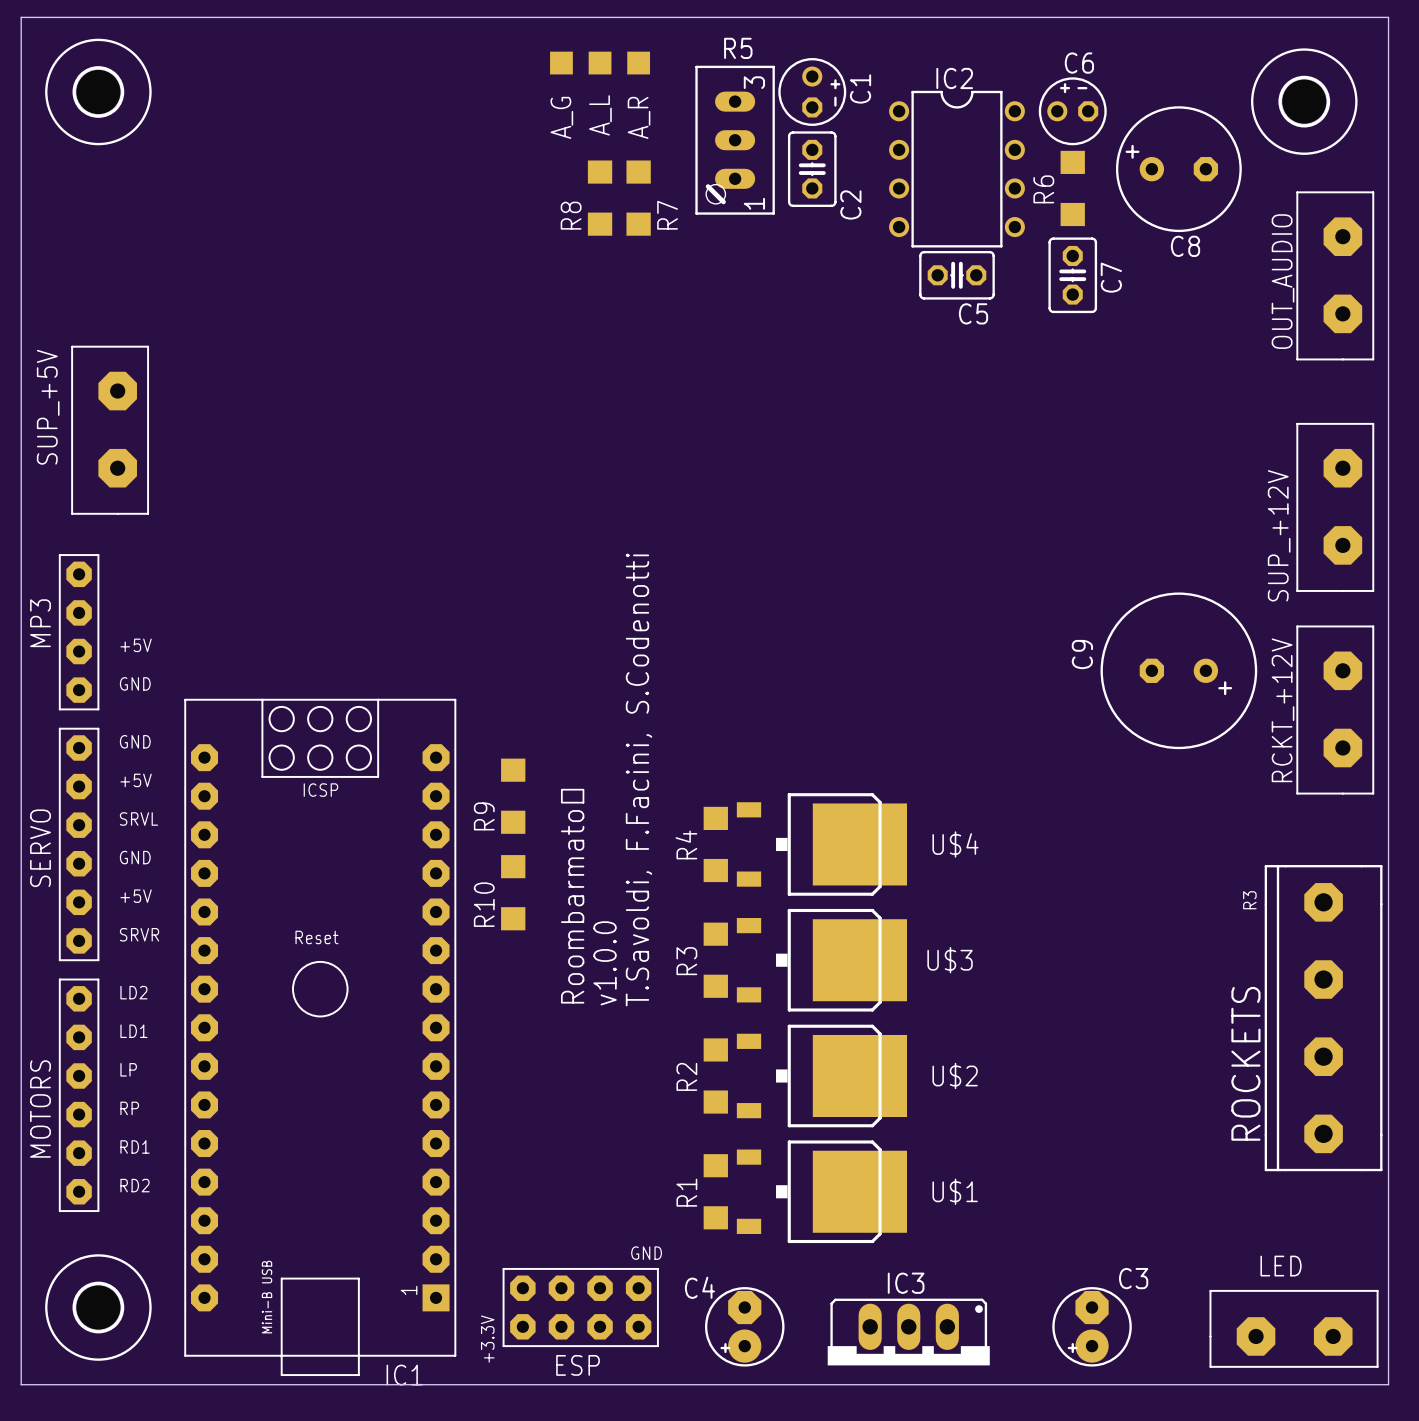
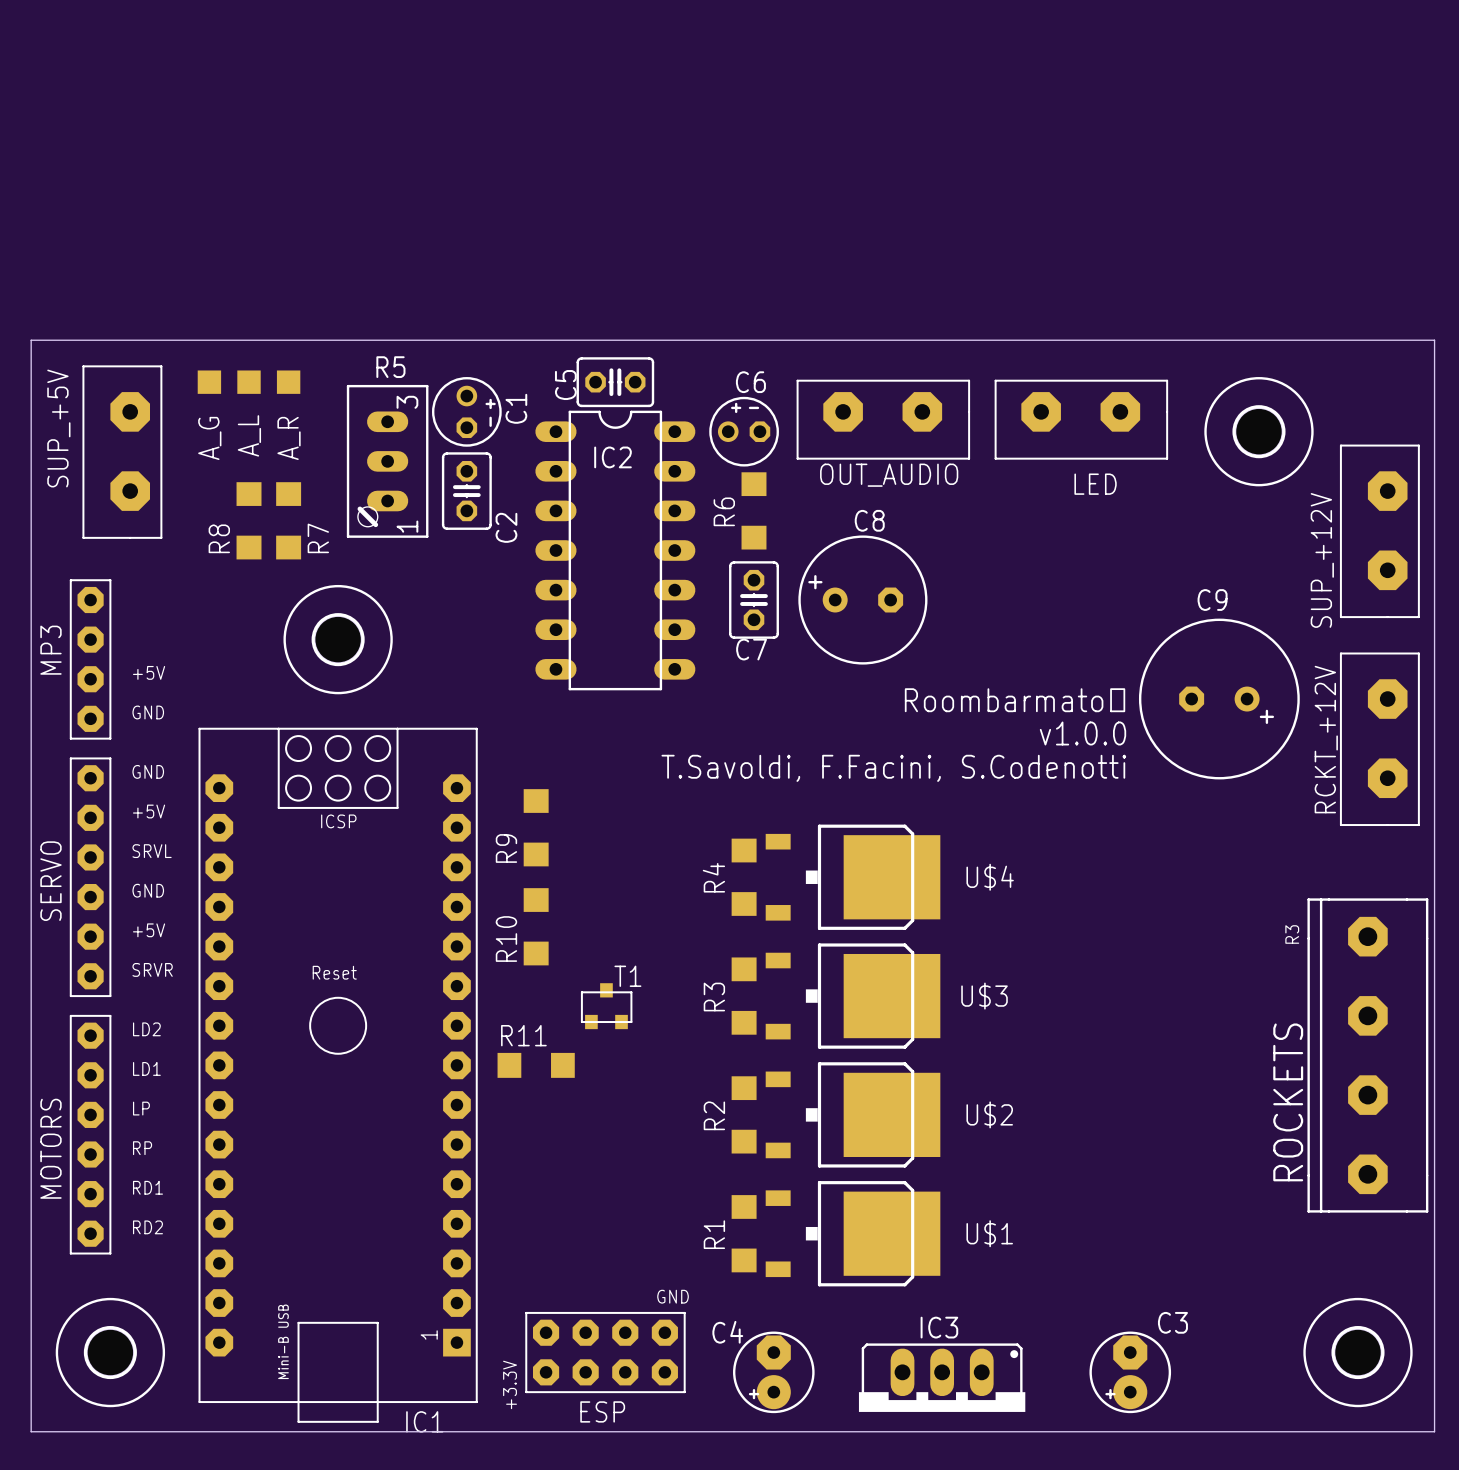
A_G: (561, 63) -> none
A_L: (600, 63) -> none
A_R: (638, 63) -> none
IC2 footprint: [889, 90, 1025, 248] -> [535, 410, 696, 691]
part: (98, 91) -> none
C1 position: (812, 91) -> (466, 411)
part position: (1304, 101) -> (1258, 431)
C6 position: (1072, 111) -> (744, 431)
R5 position: (735, 140) -> (387, 461)
C2 position: (812, 169) -> (466, 491)
C8 position: (1178, 169) -> (862, 600)
R6 position: (1072, 188) -> (754, 510)
R8 position: (600, 198) -> (249, 520)
R7 position: (638, 198) -> (288, 520)
C8 name position: C8 (1185, 246) -> C8 (869, 520)
C5 position: (956, 275) -> (615, 382)
C7 position: (1072, 275) -> (754, 600)
OUT_AUDIO: (1335, 275) -> none
C7 name rotation: 0° (1111, 277) -> 90° clockwise (751, 649)
C7 name position: C7 (1111, 277) -> C7 (751, 649)
C5 name rotation: 0° (973, 313) -> 90° counterclockwise (565, 385)
C5 name position: C5 (973, 313) -> C5 (565, 385)
board edge: (21, 321) (21, 17) (1388, 17) (1388, 321) -> (31, 340) (1434, 340)
A_G: none -> (209, 382)
A_L: none -> (249, 382)
A_R: none -> (288, 382)
OUT_AUDIO: none -> (883, 419)
LED: none -> (1081, 419)
part: none -> (338, 639)
C9 name rotation: 0° (1082, 654) -> 90° clockwise (1212, 600)
C9 name position: C9 (1082, 654) -> C9 (1212, 600)
text: none -> Roombarmato™ (1015, 700)
text: none -> v1.0.0 (1082, 733)
text: none -> T.Savoldi, F.Facini, S.Codenotti (893, 768)
text: T.Savoldi, F.Facini, S.Codenotti (639, 779) -> none
text: Roombarmato™ (572, 896) -> none
text: v1.0.0 (605, 963) -> none
T1: none -> (606, 1006)
R11: none -> (536, 1065)
part: none -> (1358, 1352)
LED: (1294, 1328) -> none

